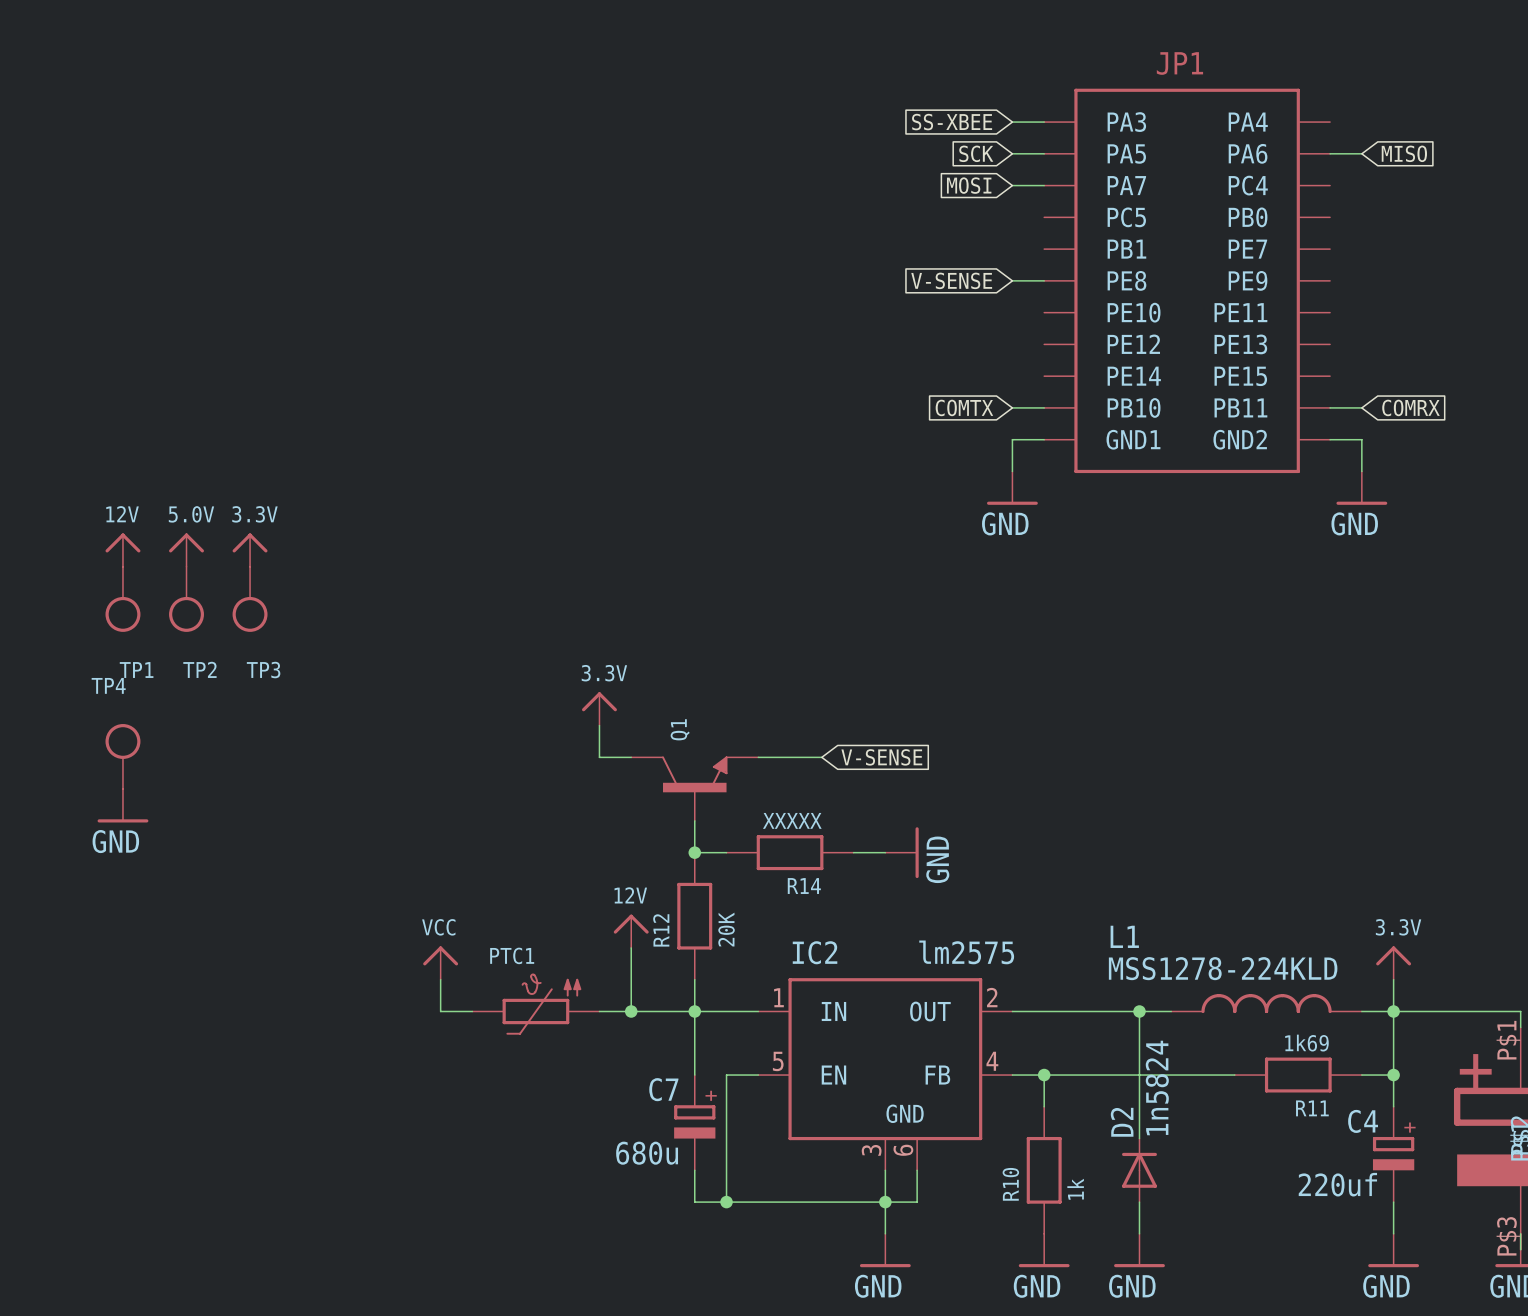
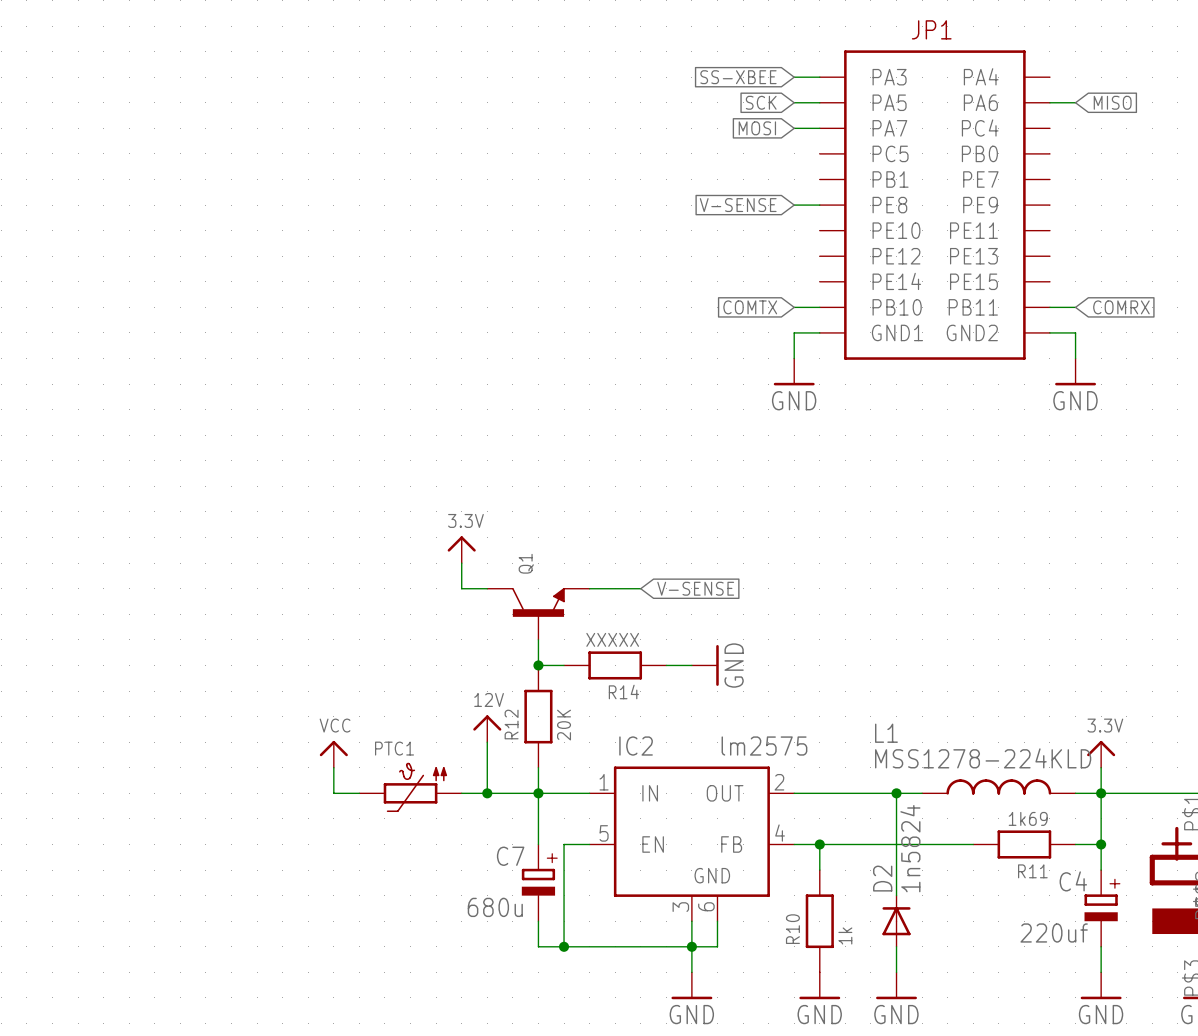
power symbol: 12V (122, 550) -> none
power symbol: 5.0V (186, 550) -> none
power symbol: 3.3V (250, 550) -> none
TP1: (122, 599) -> none
TP2: (186, 599) -> none
TP3: (250, 599) -> none
TP4: (122, 756) -> none
power symbol: GND (122, 805) -> none

